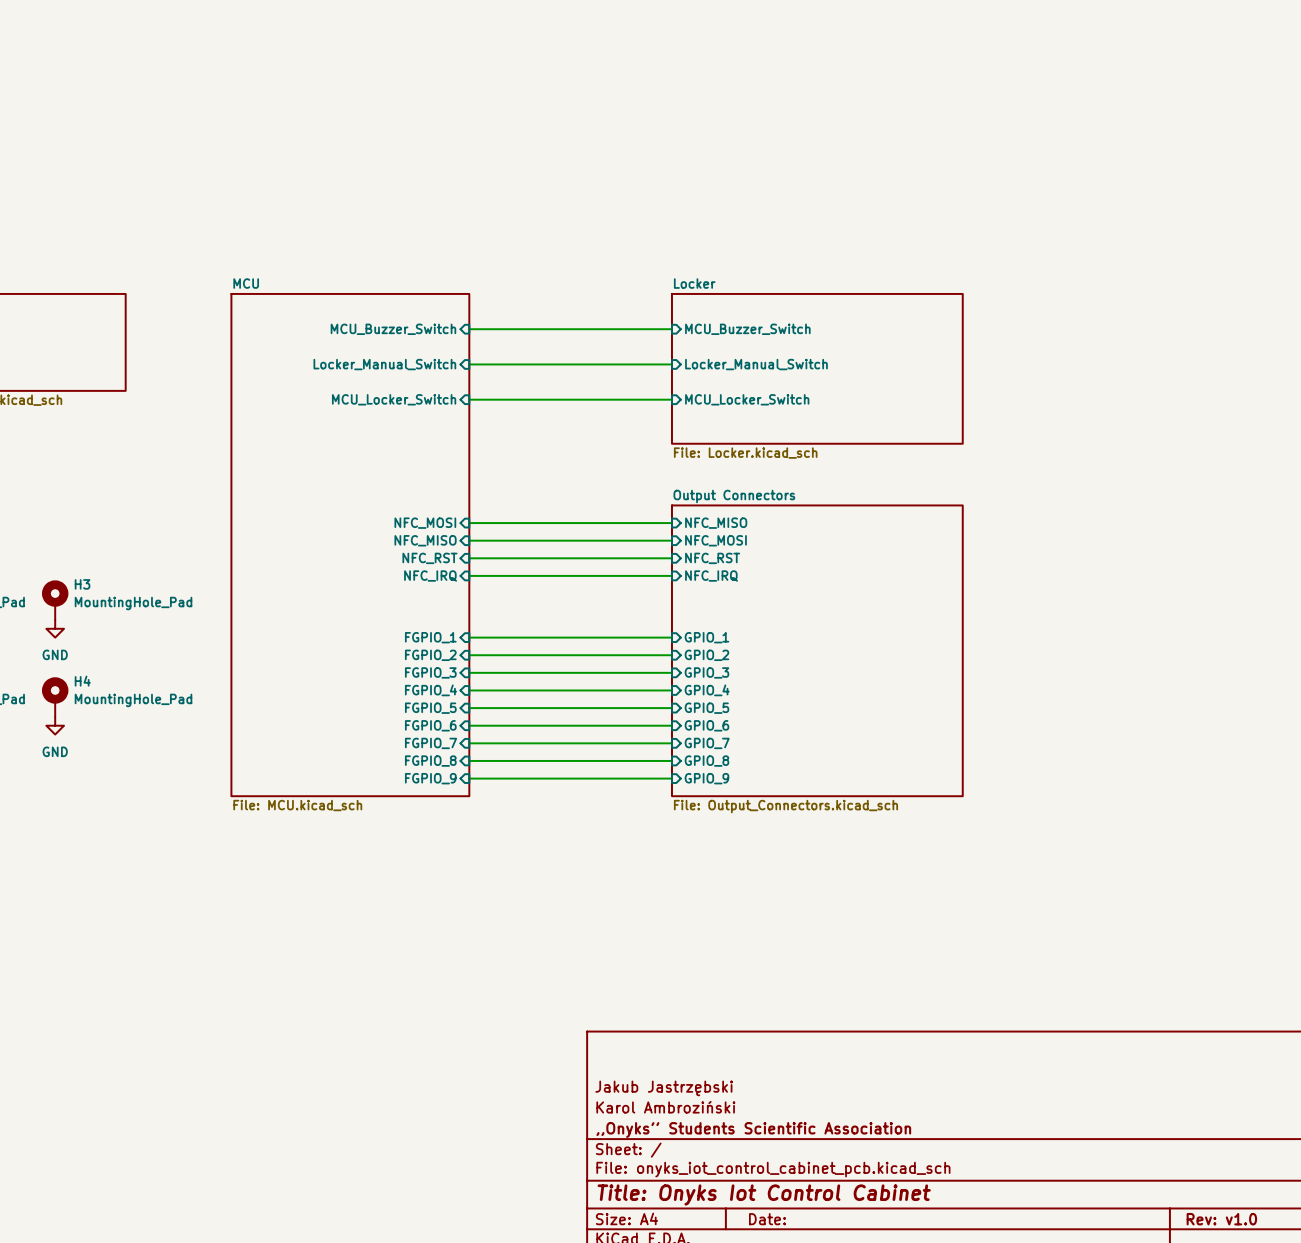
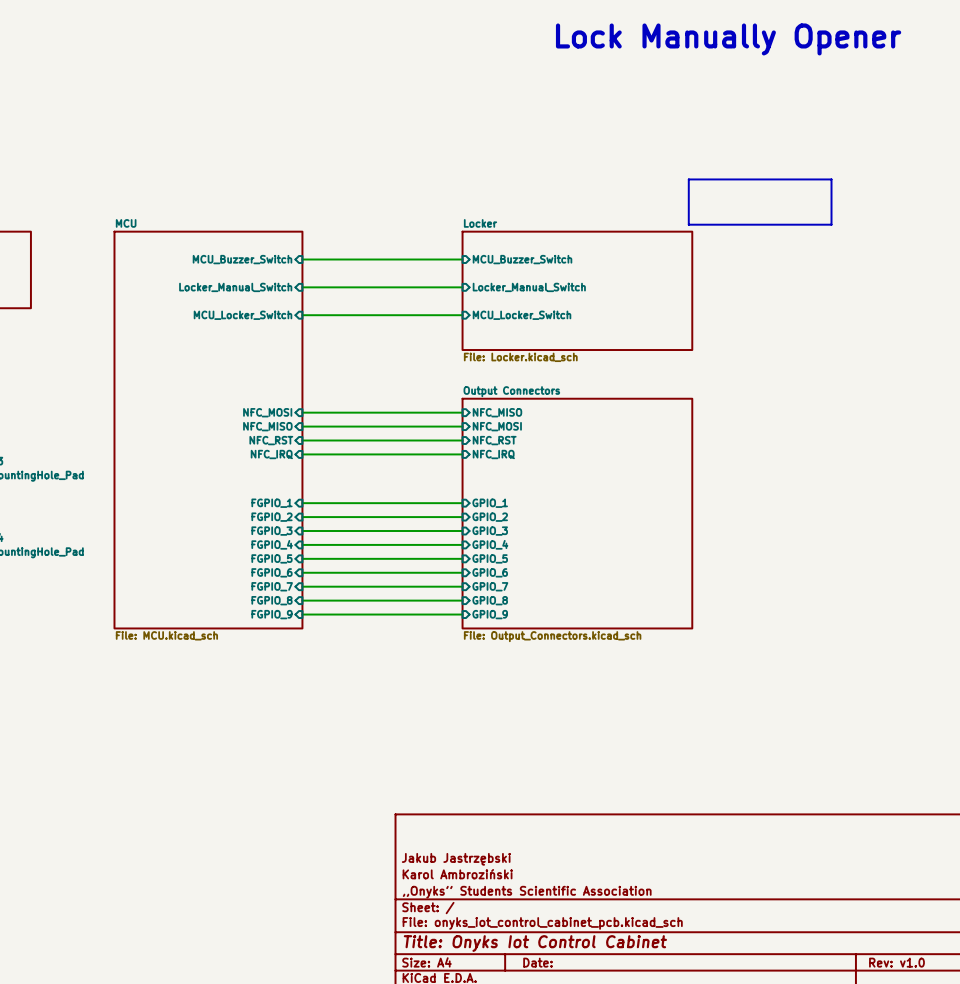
text: none -> Lock Manually Opener (728, 39)
line: none -> (688, 179) (831, 179) (831, 224) (688, 224) (688, 179)

